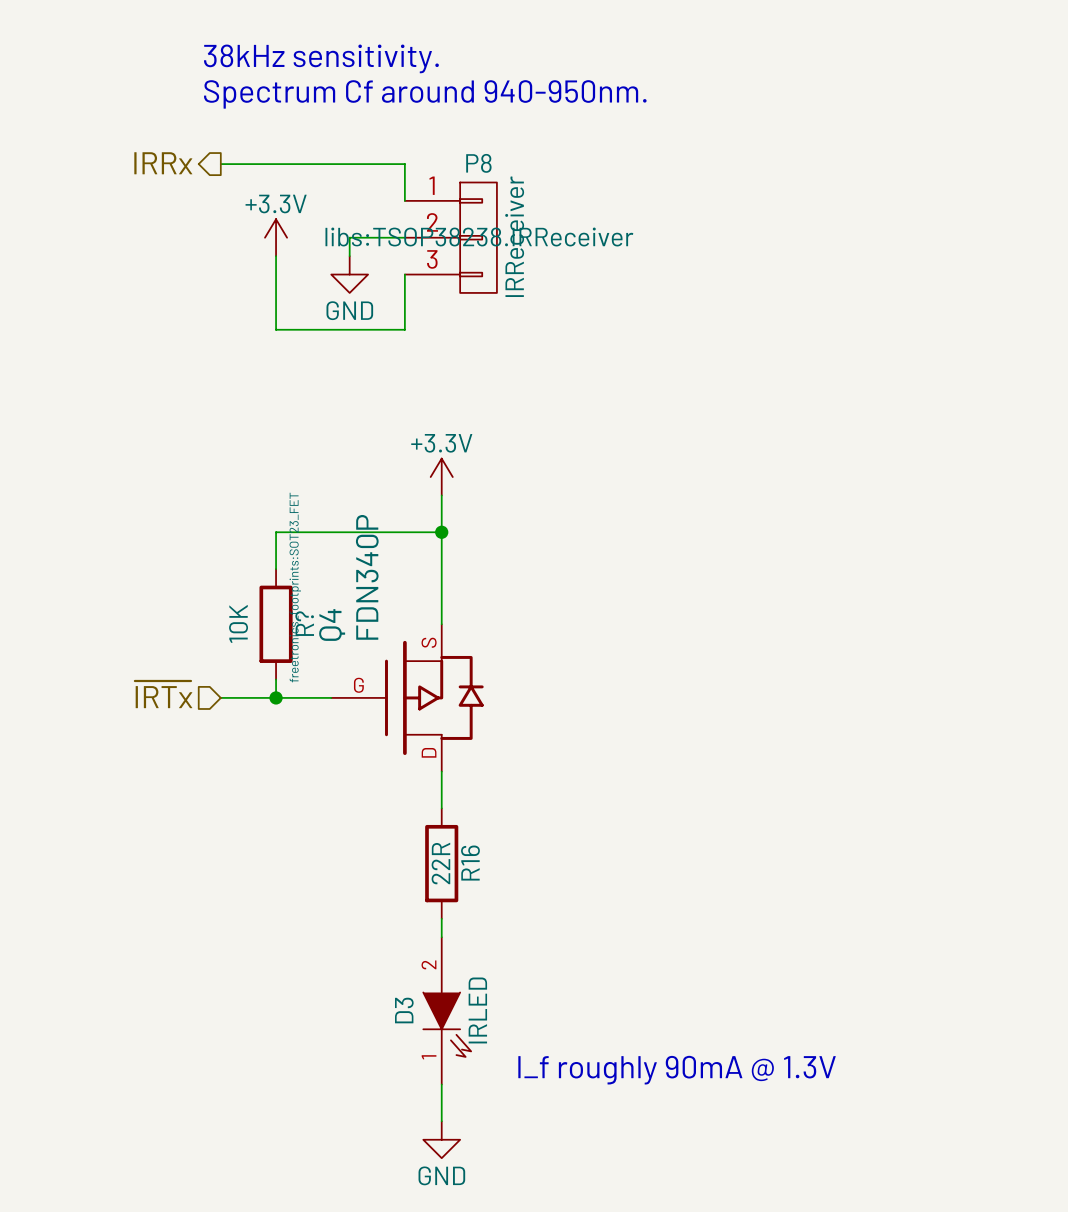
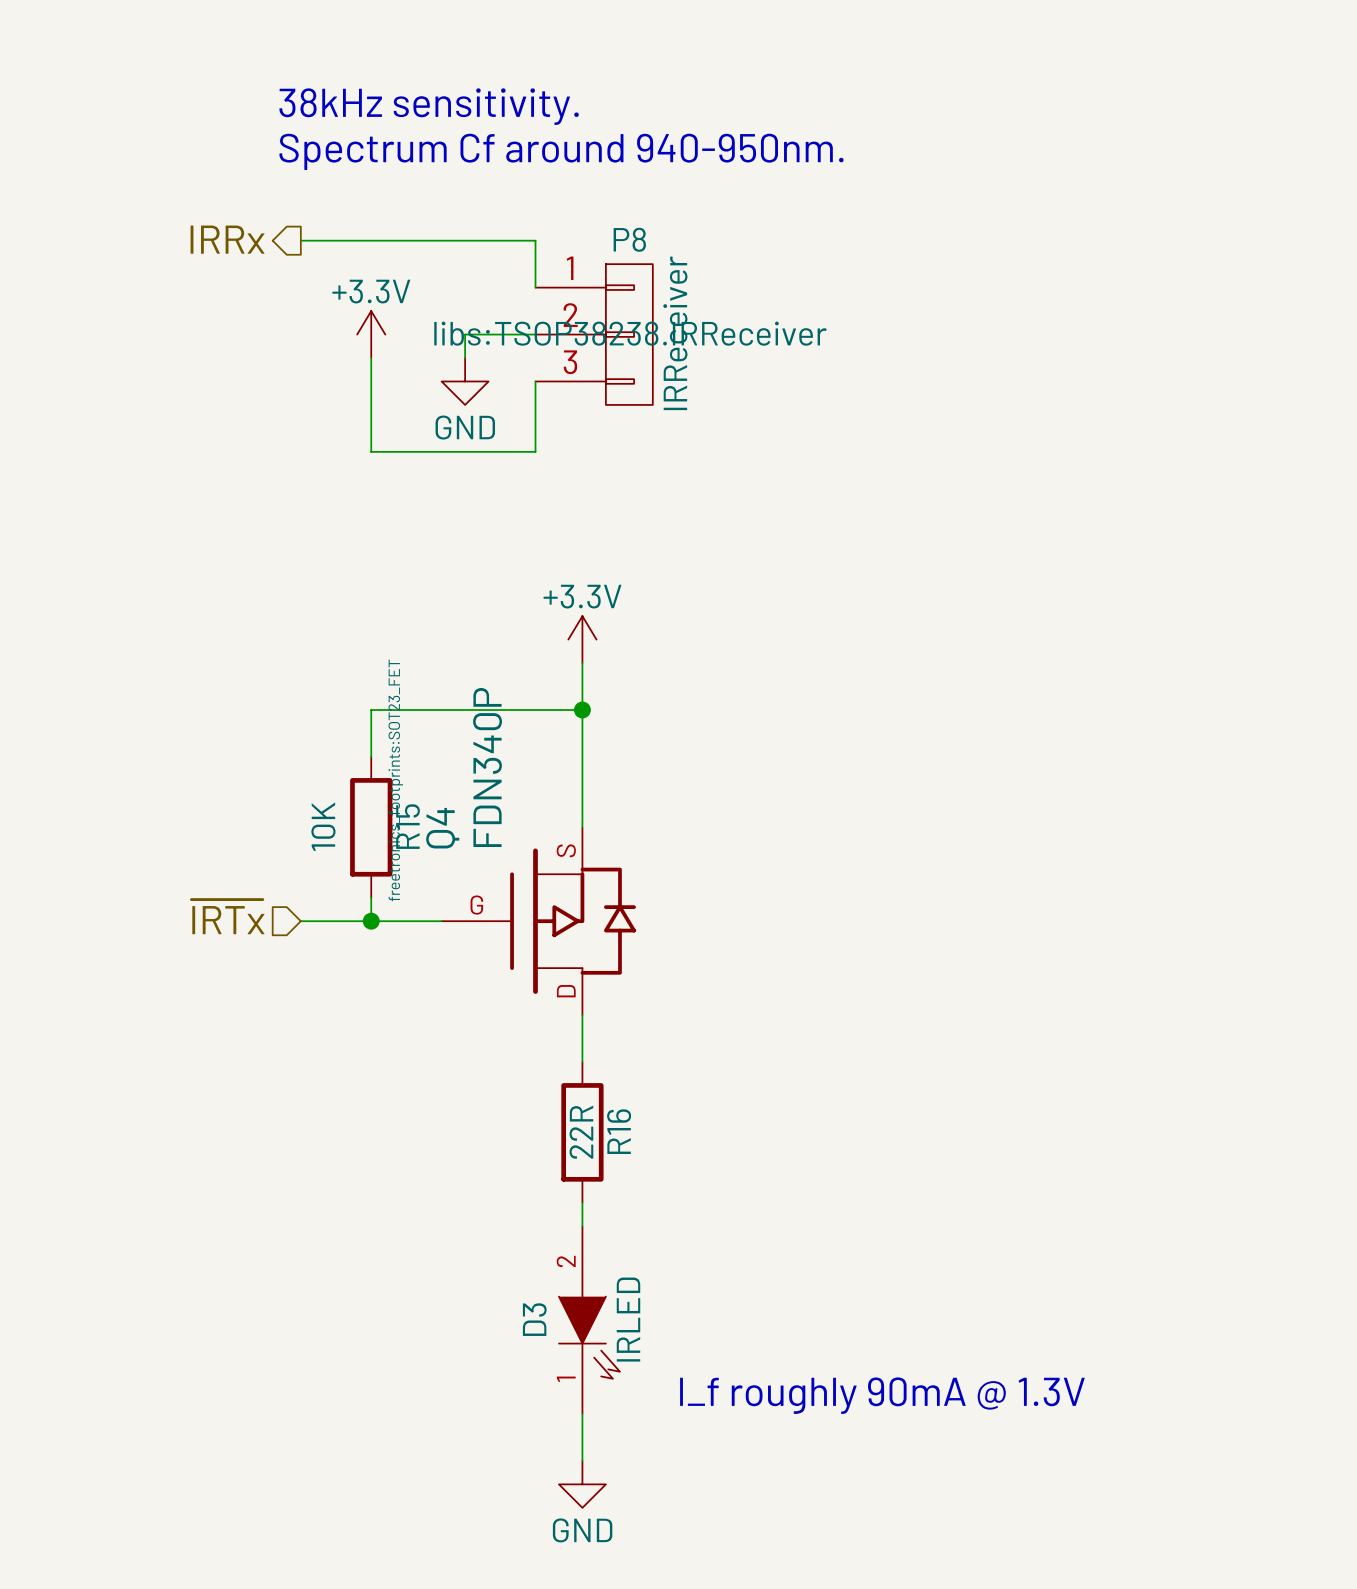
R? name: R? (304, 623) -> R15 (408, 826)

